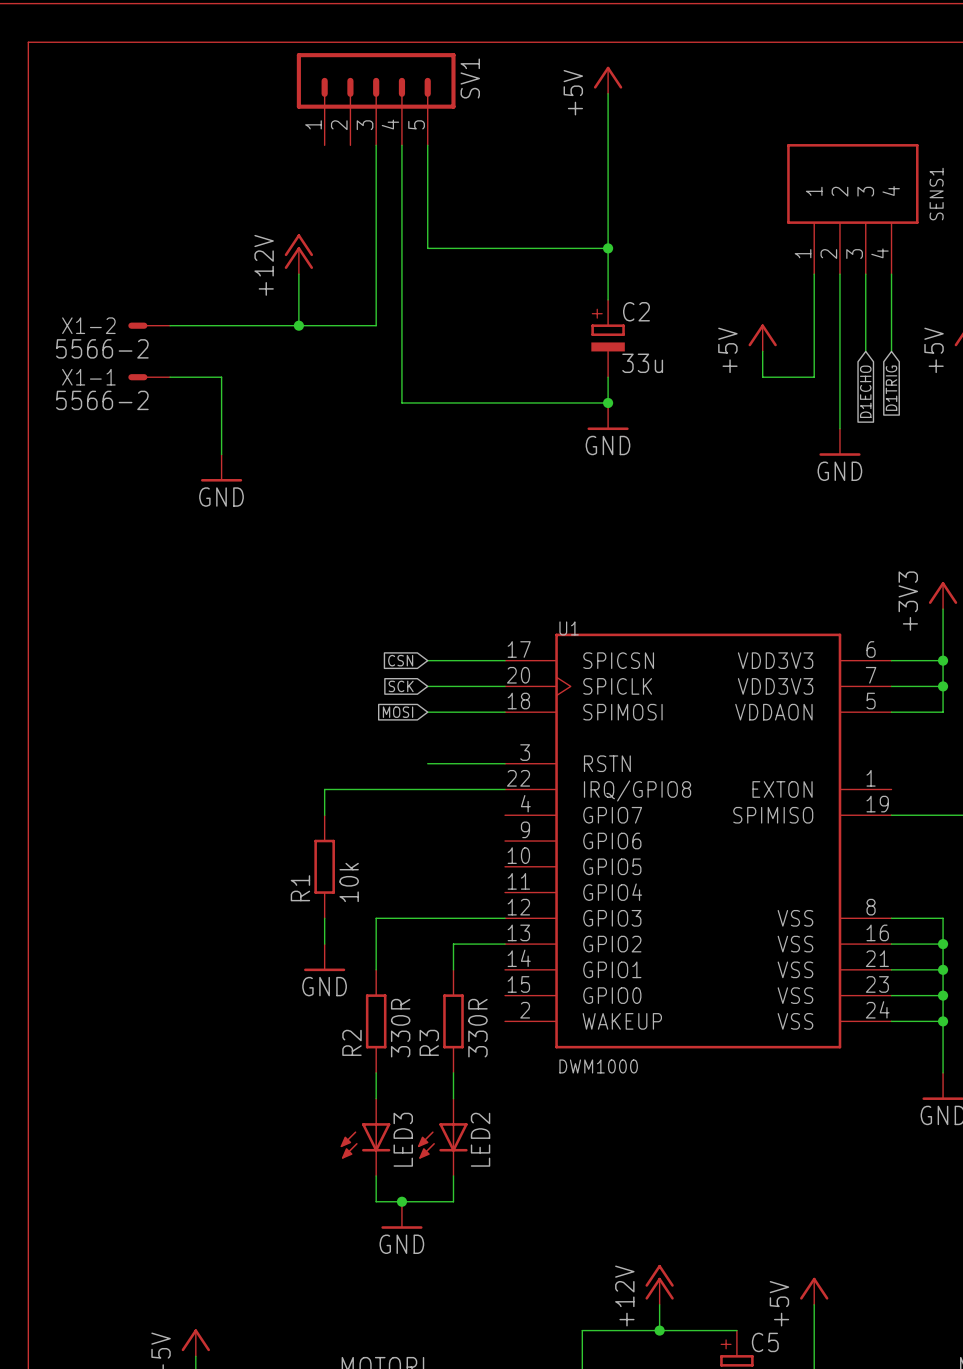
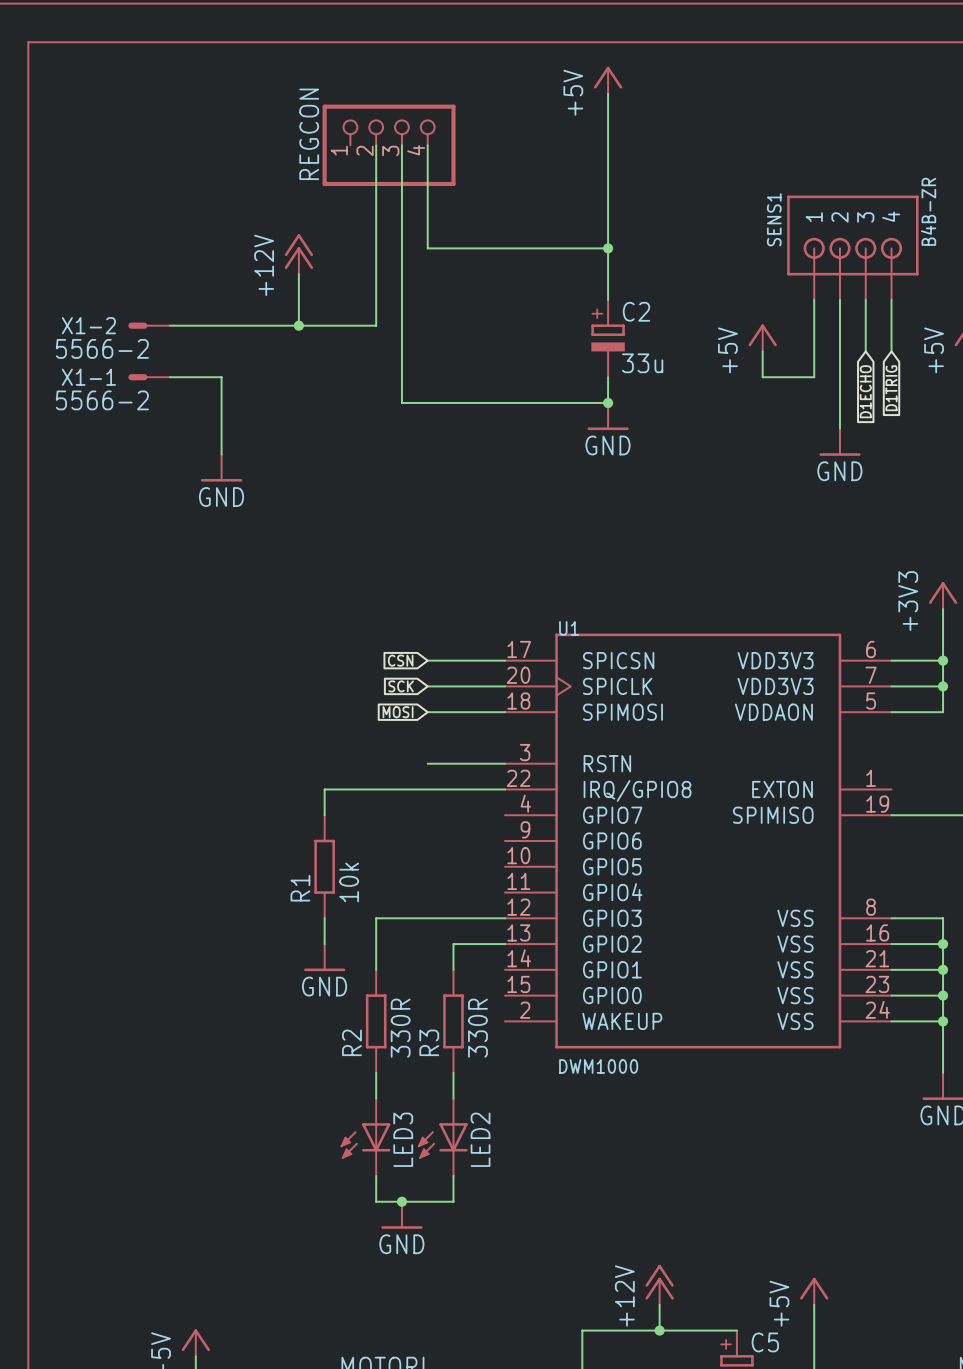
SV1: (376, 99) -> none
SENS1 symbol: [787, 144, 919, 275] -> [787, 195, 919, 300]
REGCON: none -> (389, 145)
SENS1 name position: SENS1 (936, 194) -> SENS1 (774, 219)
SENS1 value: none -> B4B-ZR (928, 211)

